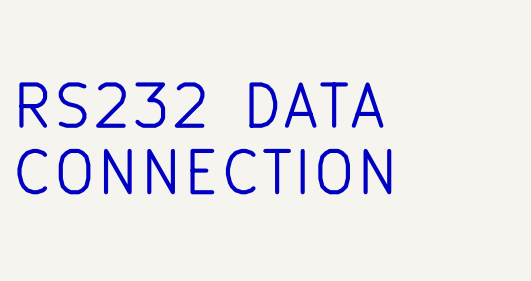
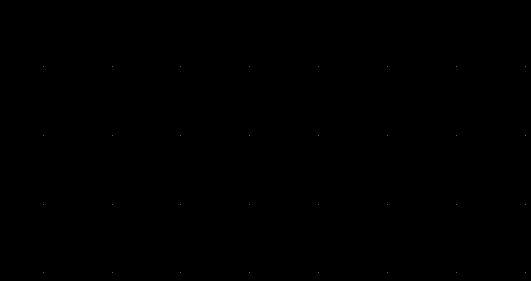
text: RS232 DATA (201, 105) -> none
text: CONNECTION (204, 171) -> none

